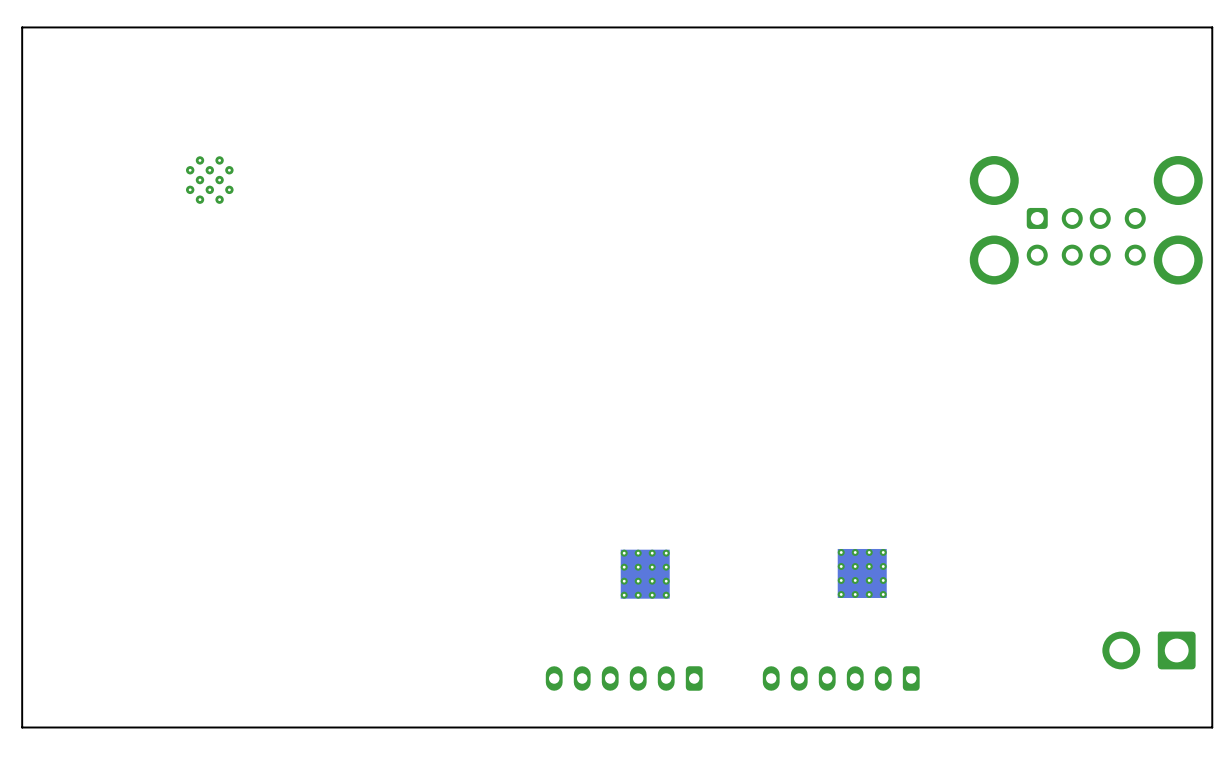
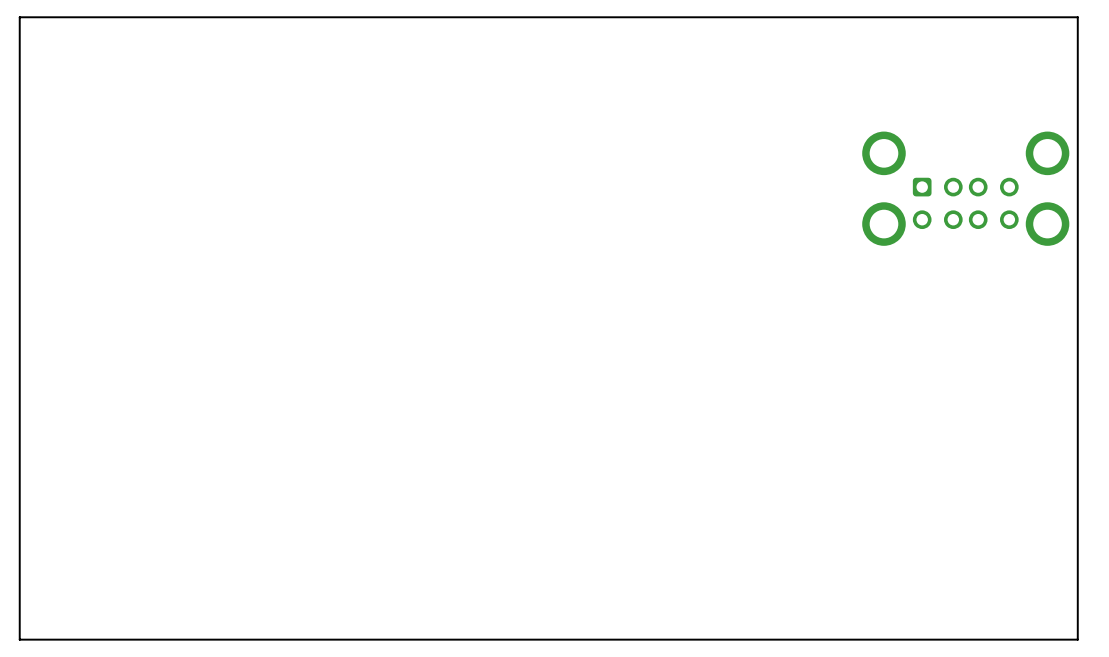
part: (209, 180) -> none
part: (862, 573) -> none
part: (645, 574) -> none
part: (1148, 650) -> none
part: (624, 678) -> none
part: (841, 678) -> none

